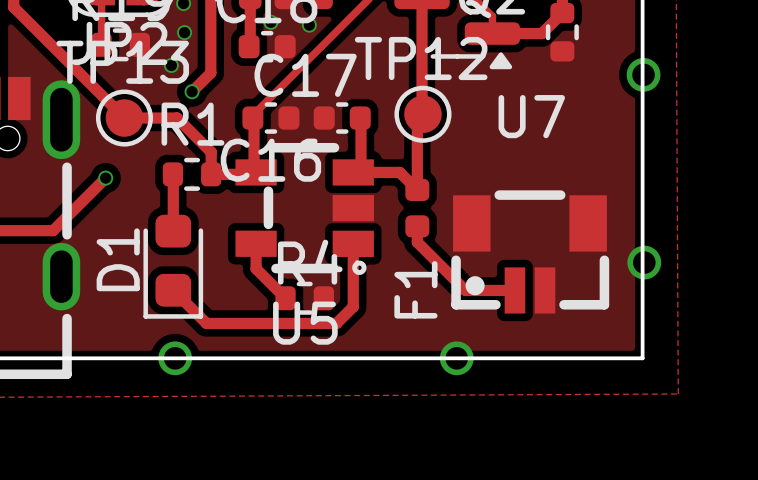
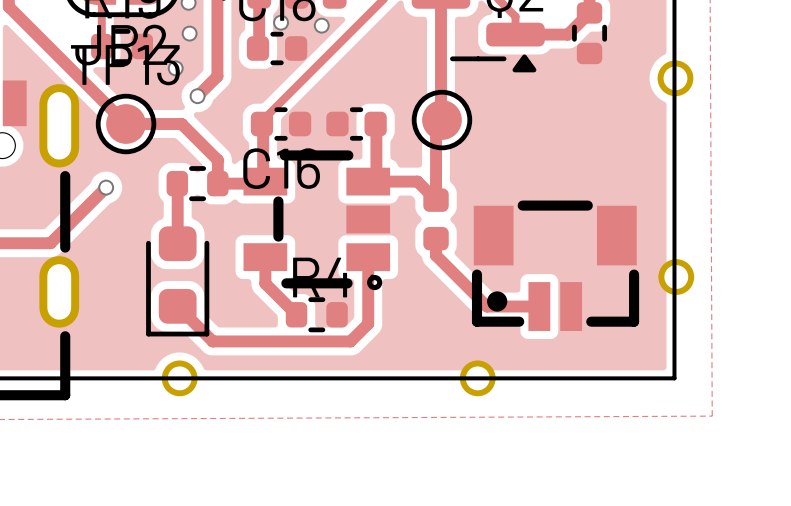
TP12 name: TP12 (421, 58) -> none
C17 name: C17 (305, 75) -> none
U7 name: U7 (531, 116) -> none
R1 name: R1 (192, 124) -> none
D1 name: D1 (118, 259) -> none
F1 name: F1 (415, 289) -> none
U5 name: U5 (305, 323) -> none

